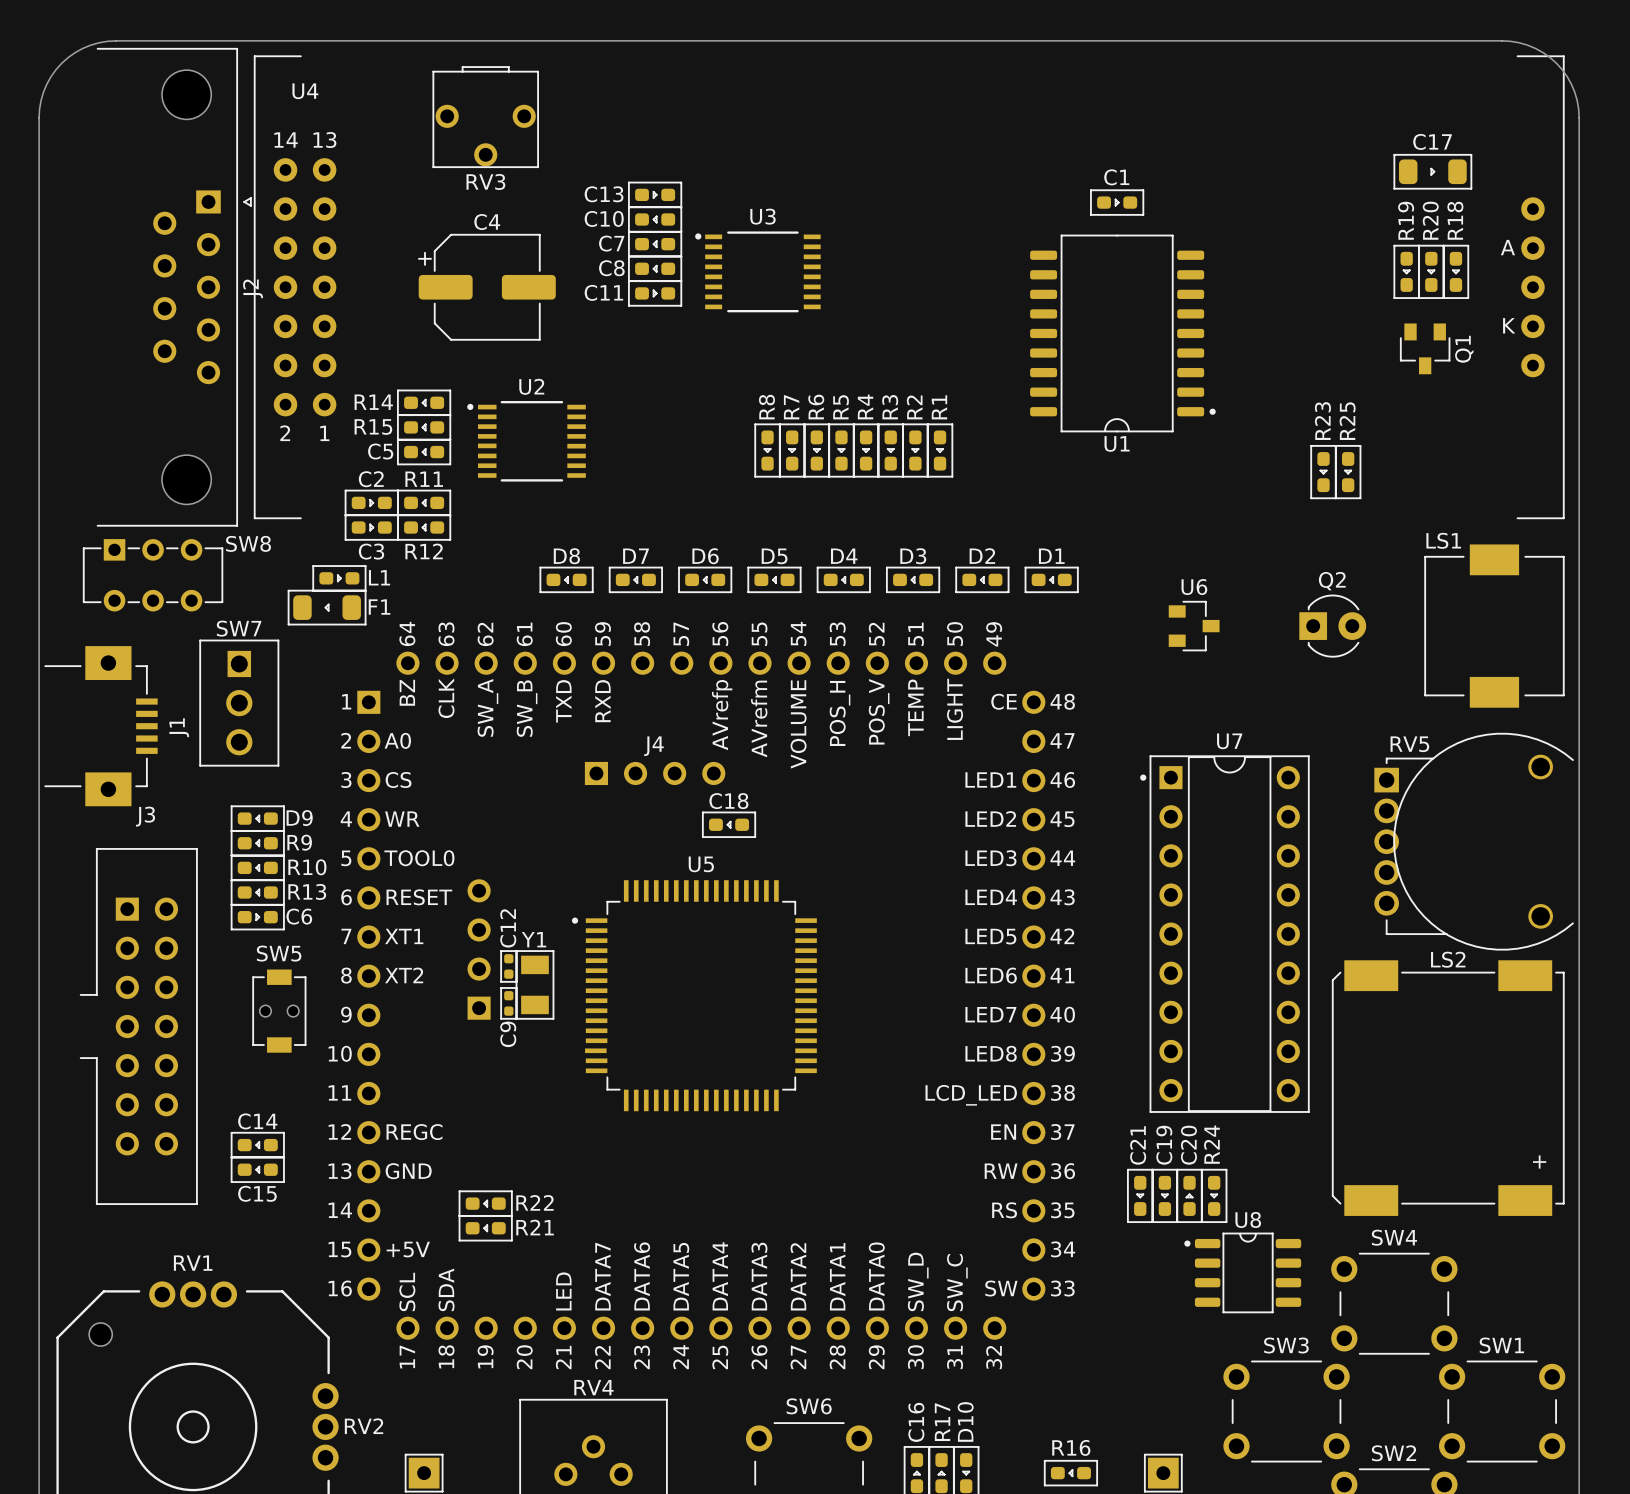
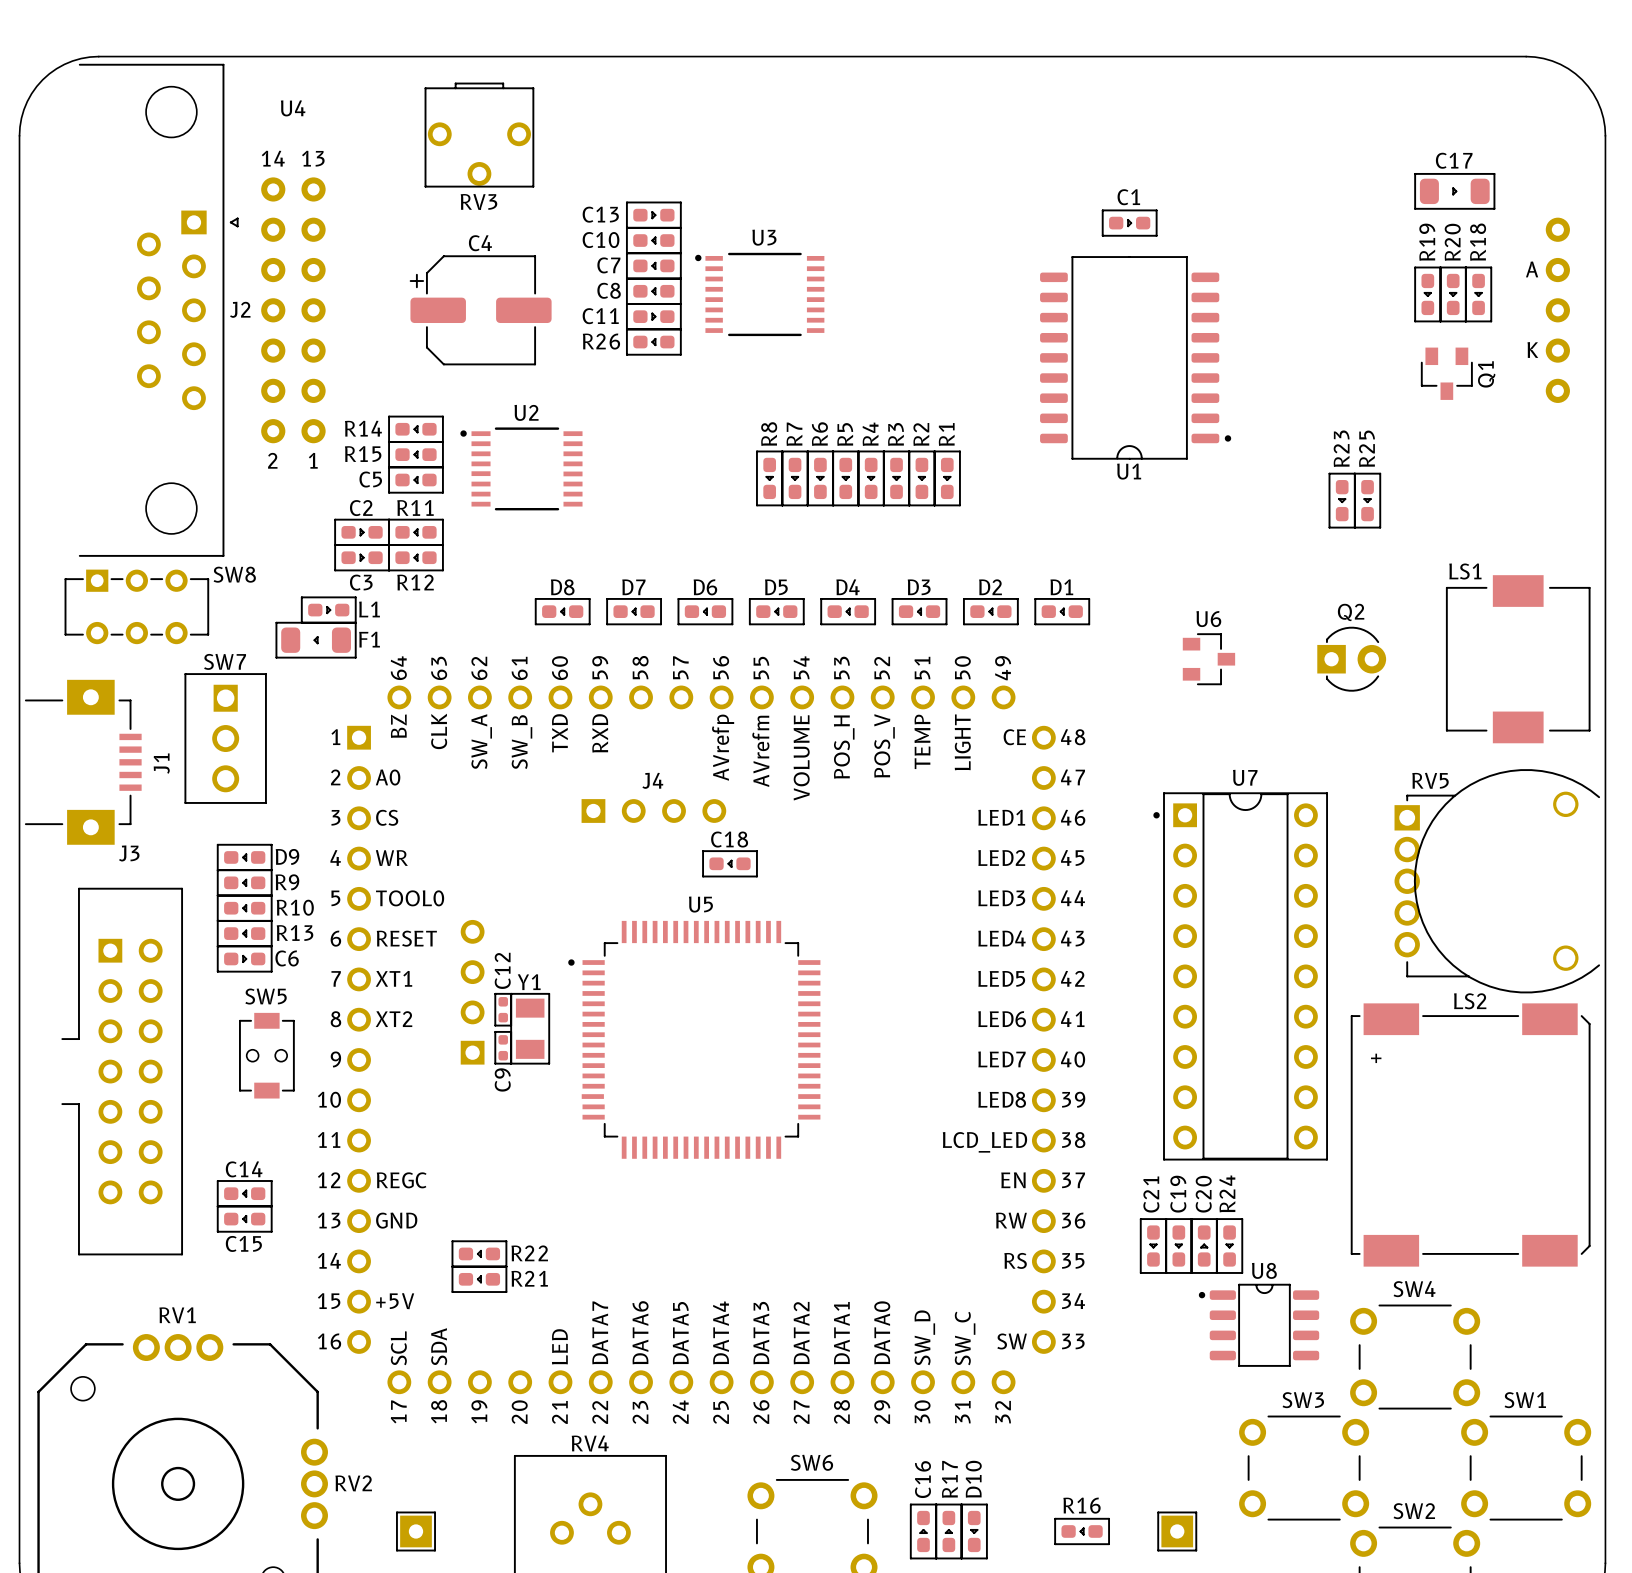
U4 footprint: [253, 55, 1565, 520] -> [261, 177, 1570, 444]
J2 name rotation: 0° (253, 288) -> 90° clockwise (240, 309)
R26: none -> (653, 342)
LS2 rotation: 0° (1448, 1088) -> 180° (1470, 1135)

